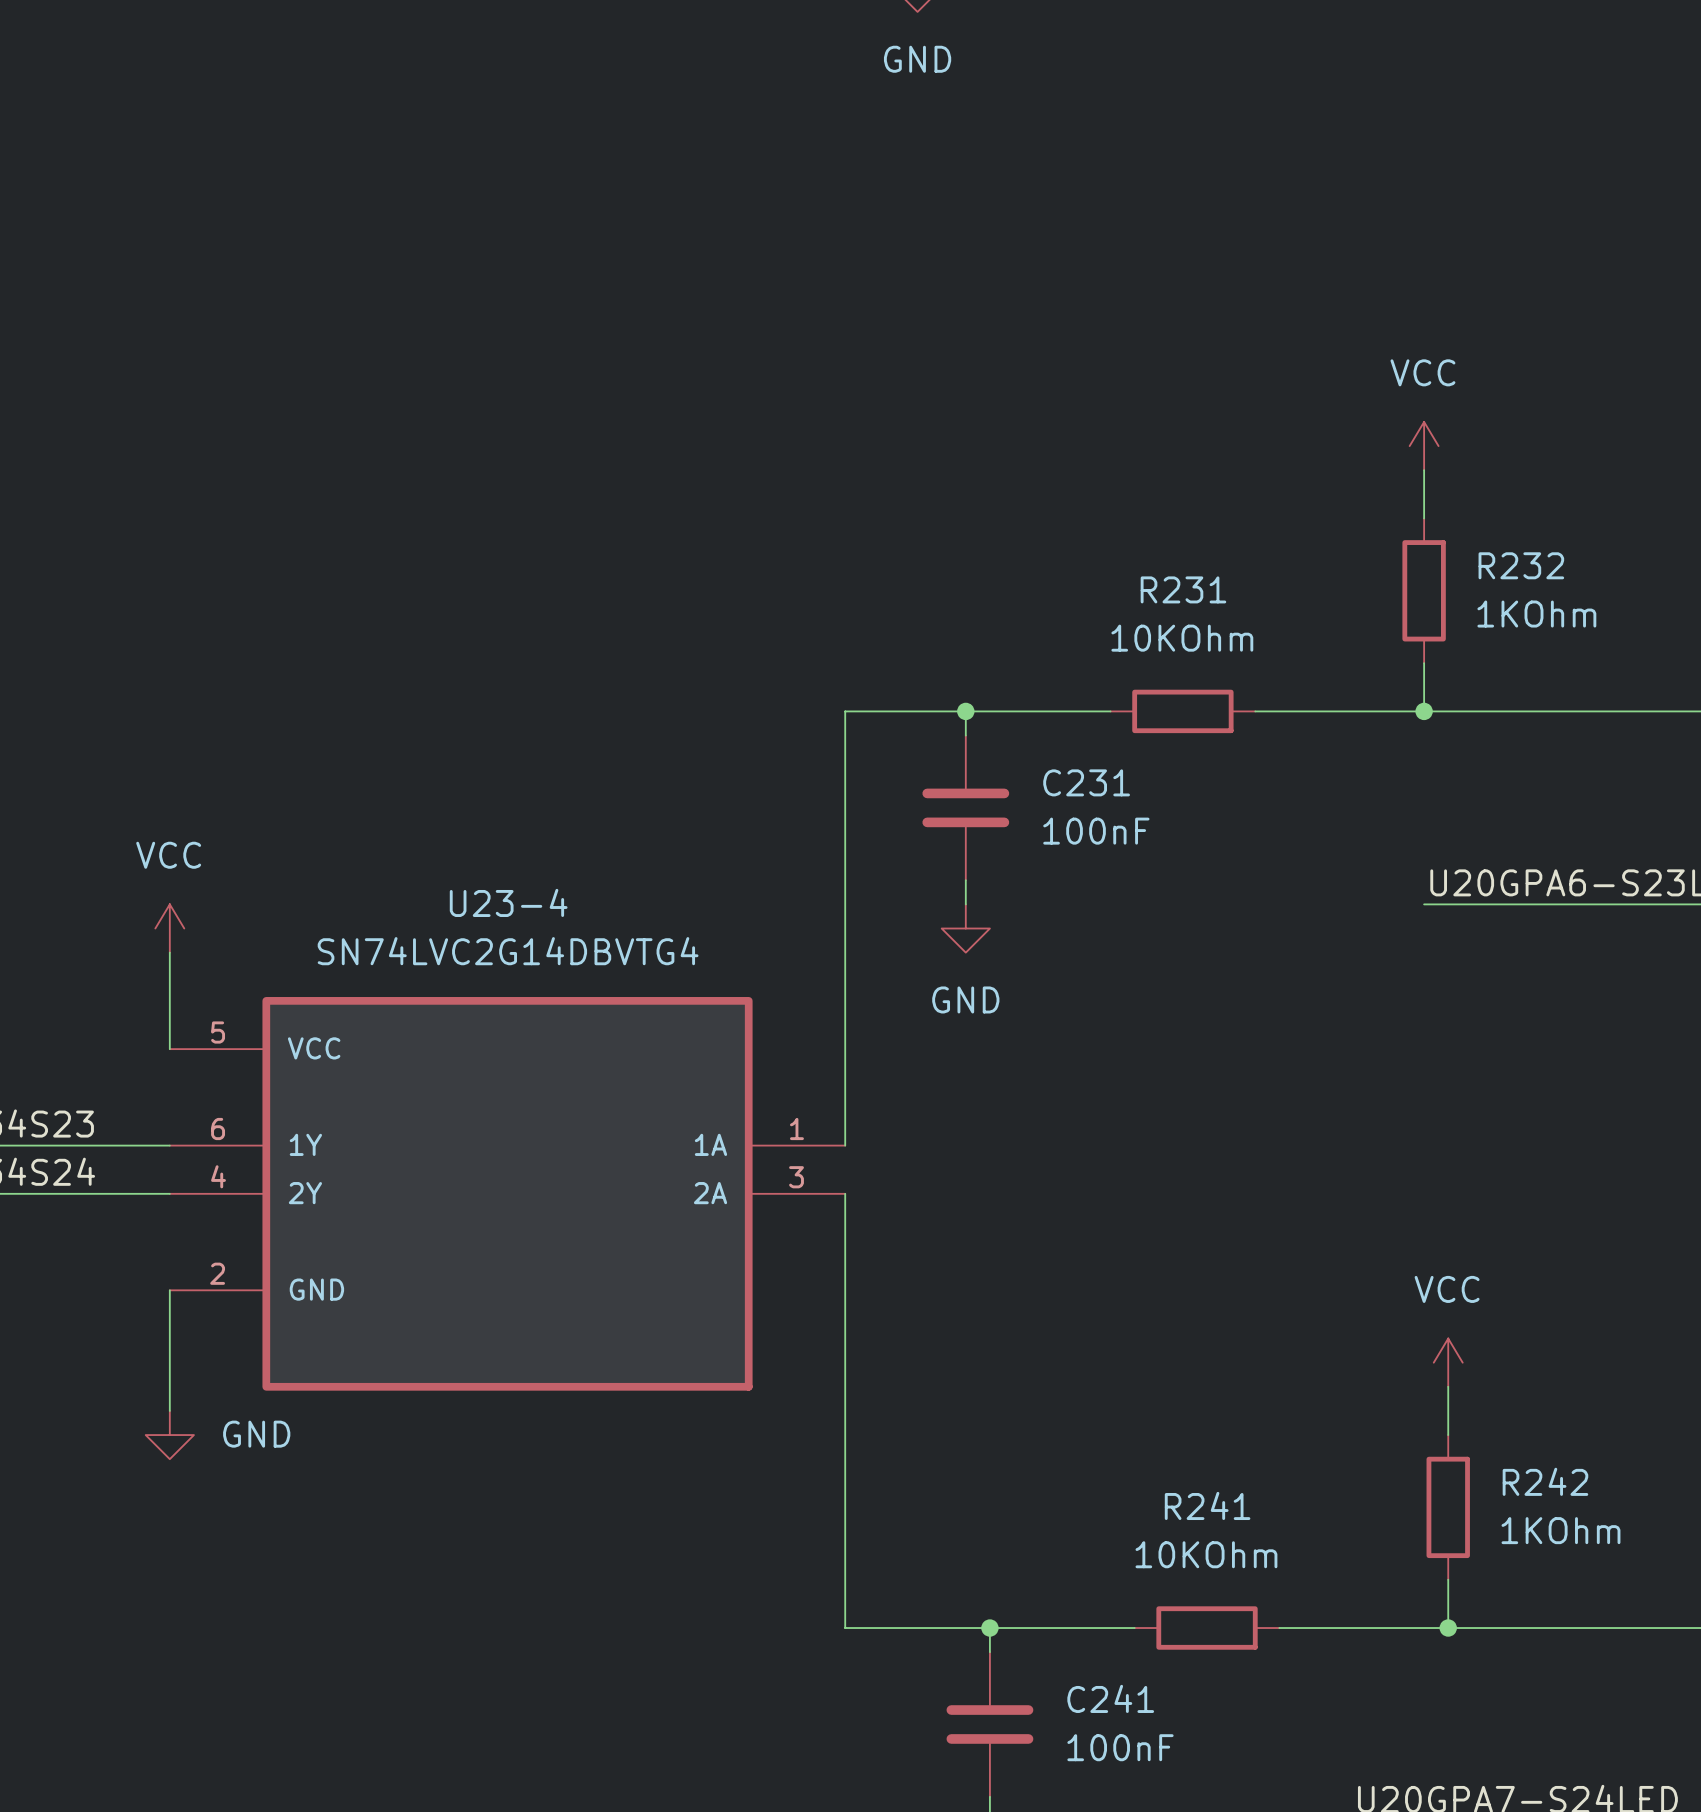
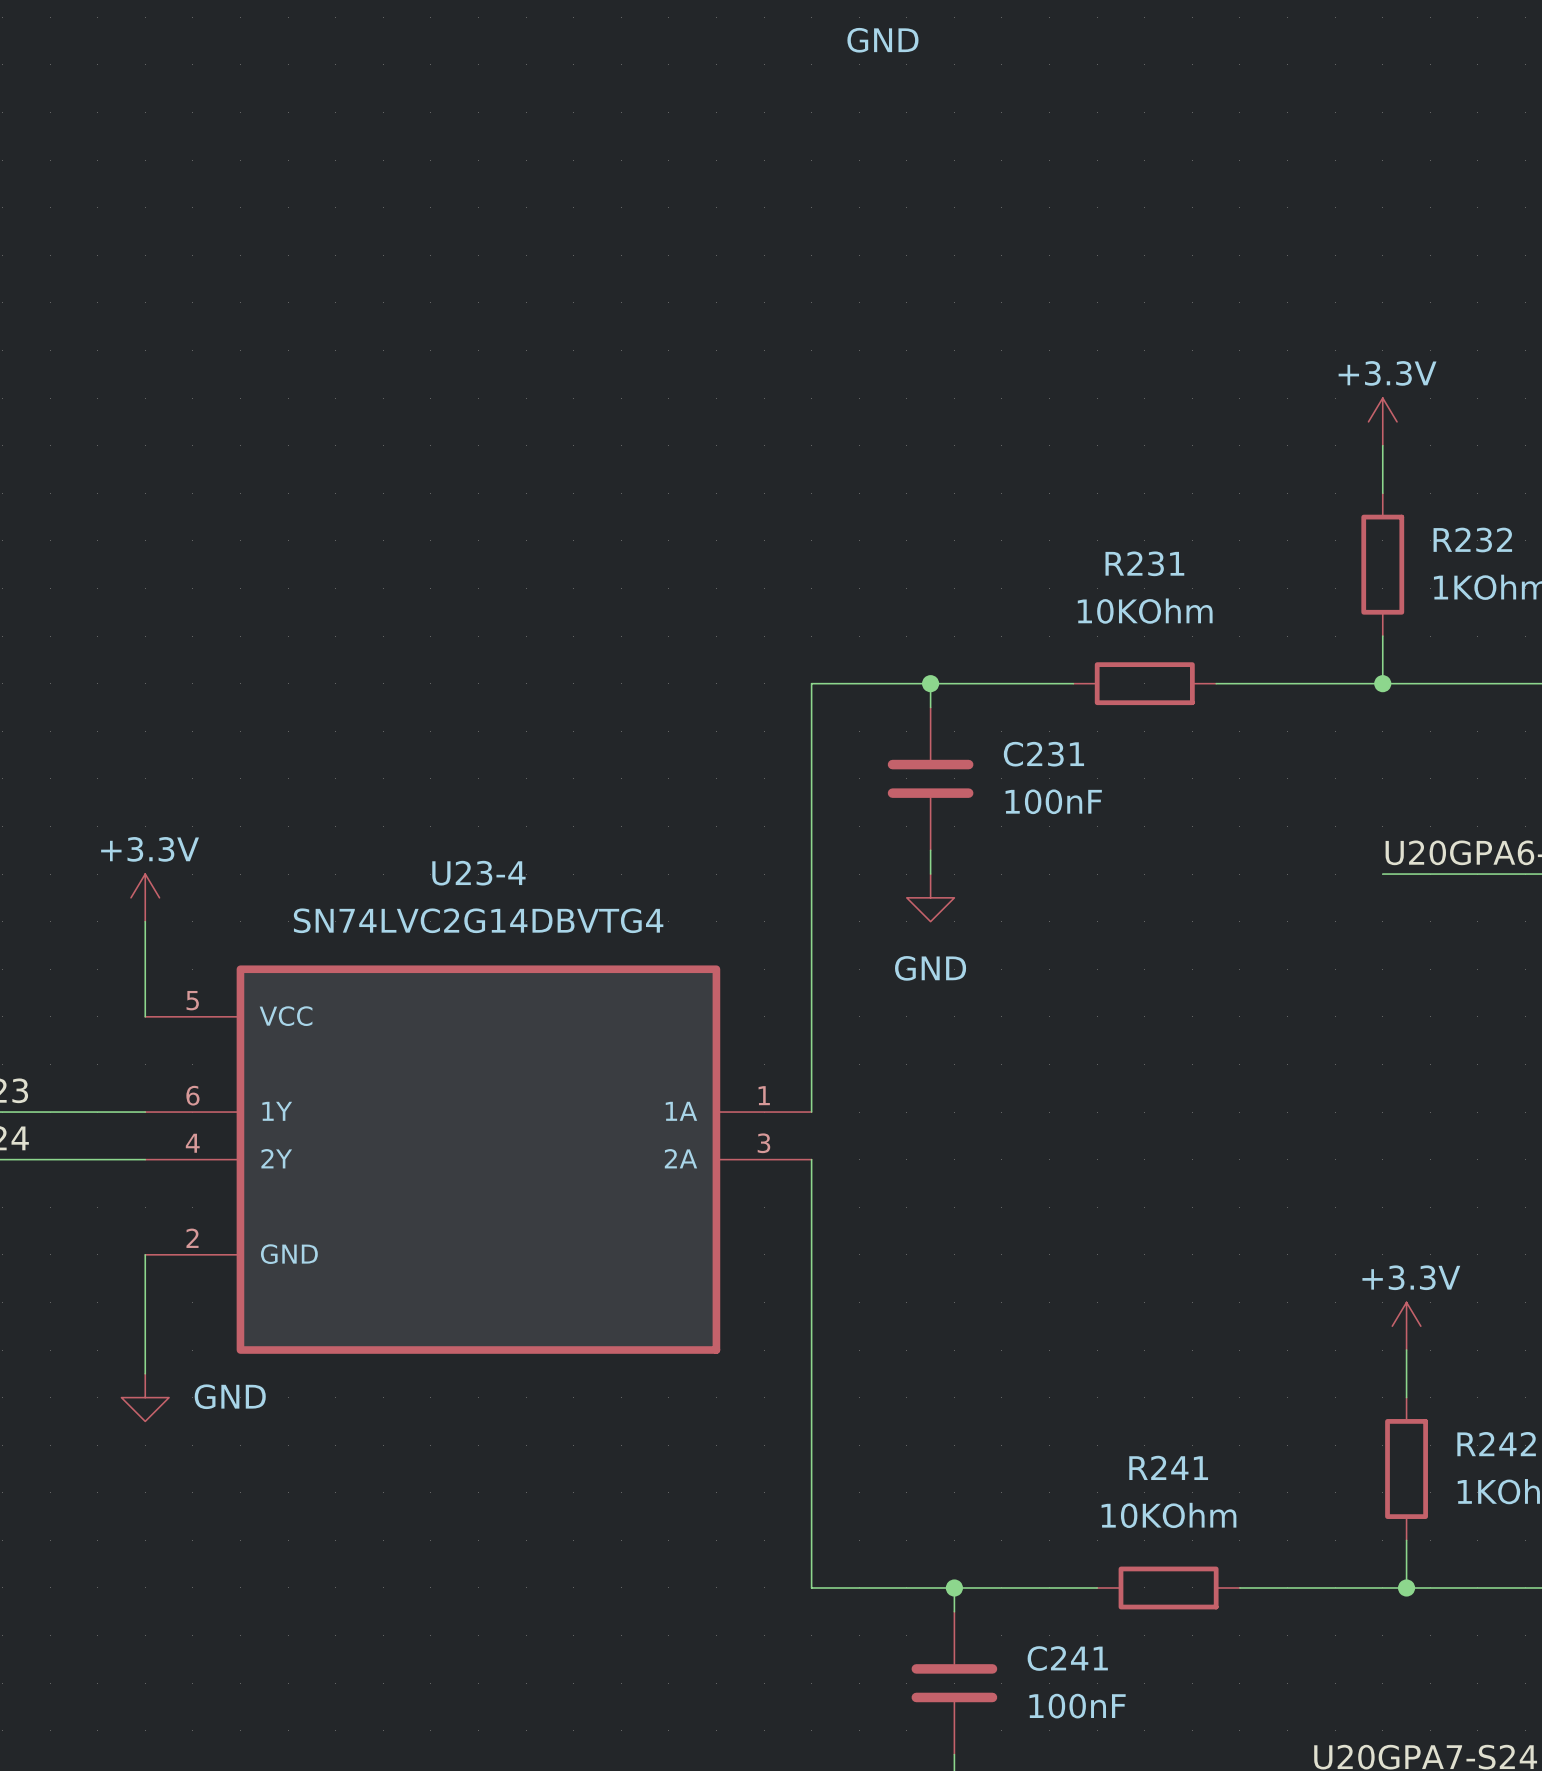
power symbol: VCC (1424, 446) -> +3.3V (1382, 421)
power symbol: VCC (169, 928) -> +3.3V (145, 897)
power symbol: VCC (1448, 1362) -> +3.3V (1406, 1326)

